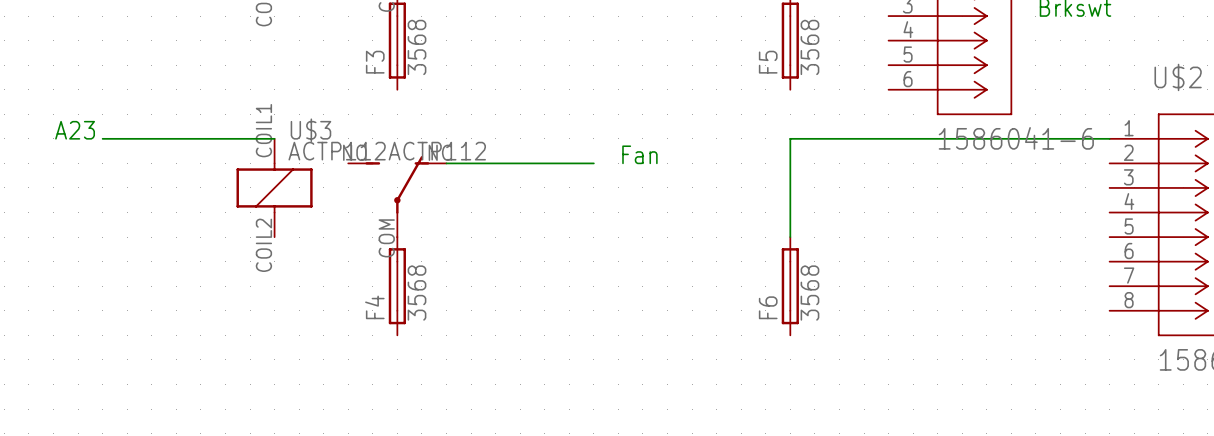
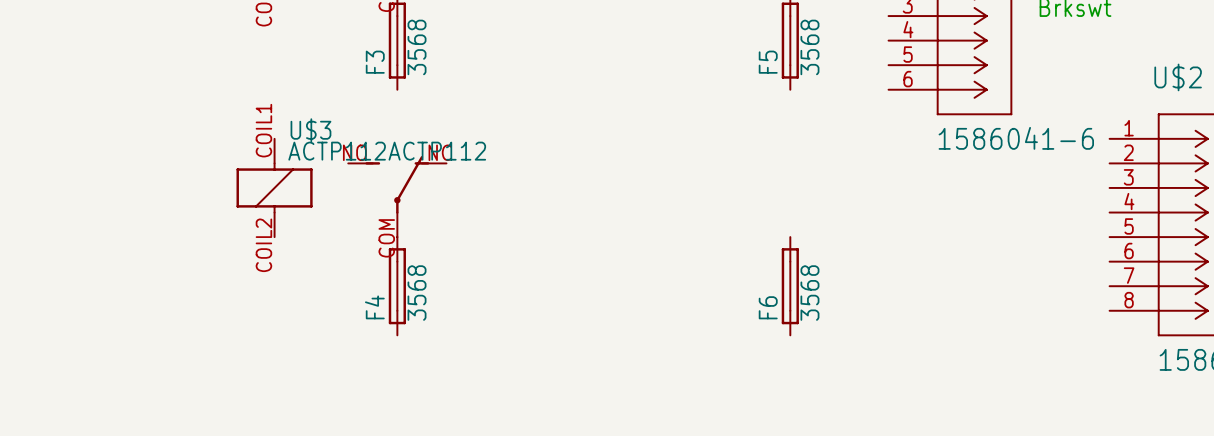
text: A23 (75, 130) -> none
wire: (102, 138) (274, 138) -> none
wire: (1109, 138) (790, 138) (790, 237) -> none
text: Fan (639, 154) -> none
wire: (446, 163) (593, 163) -> none

